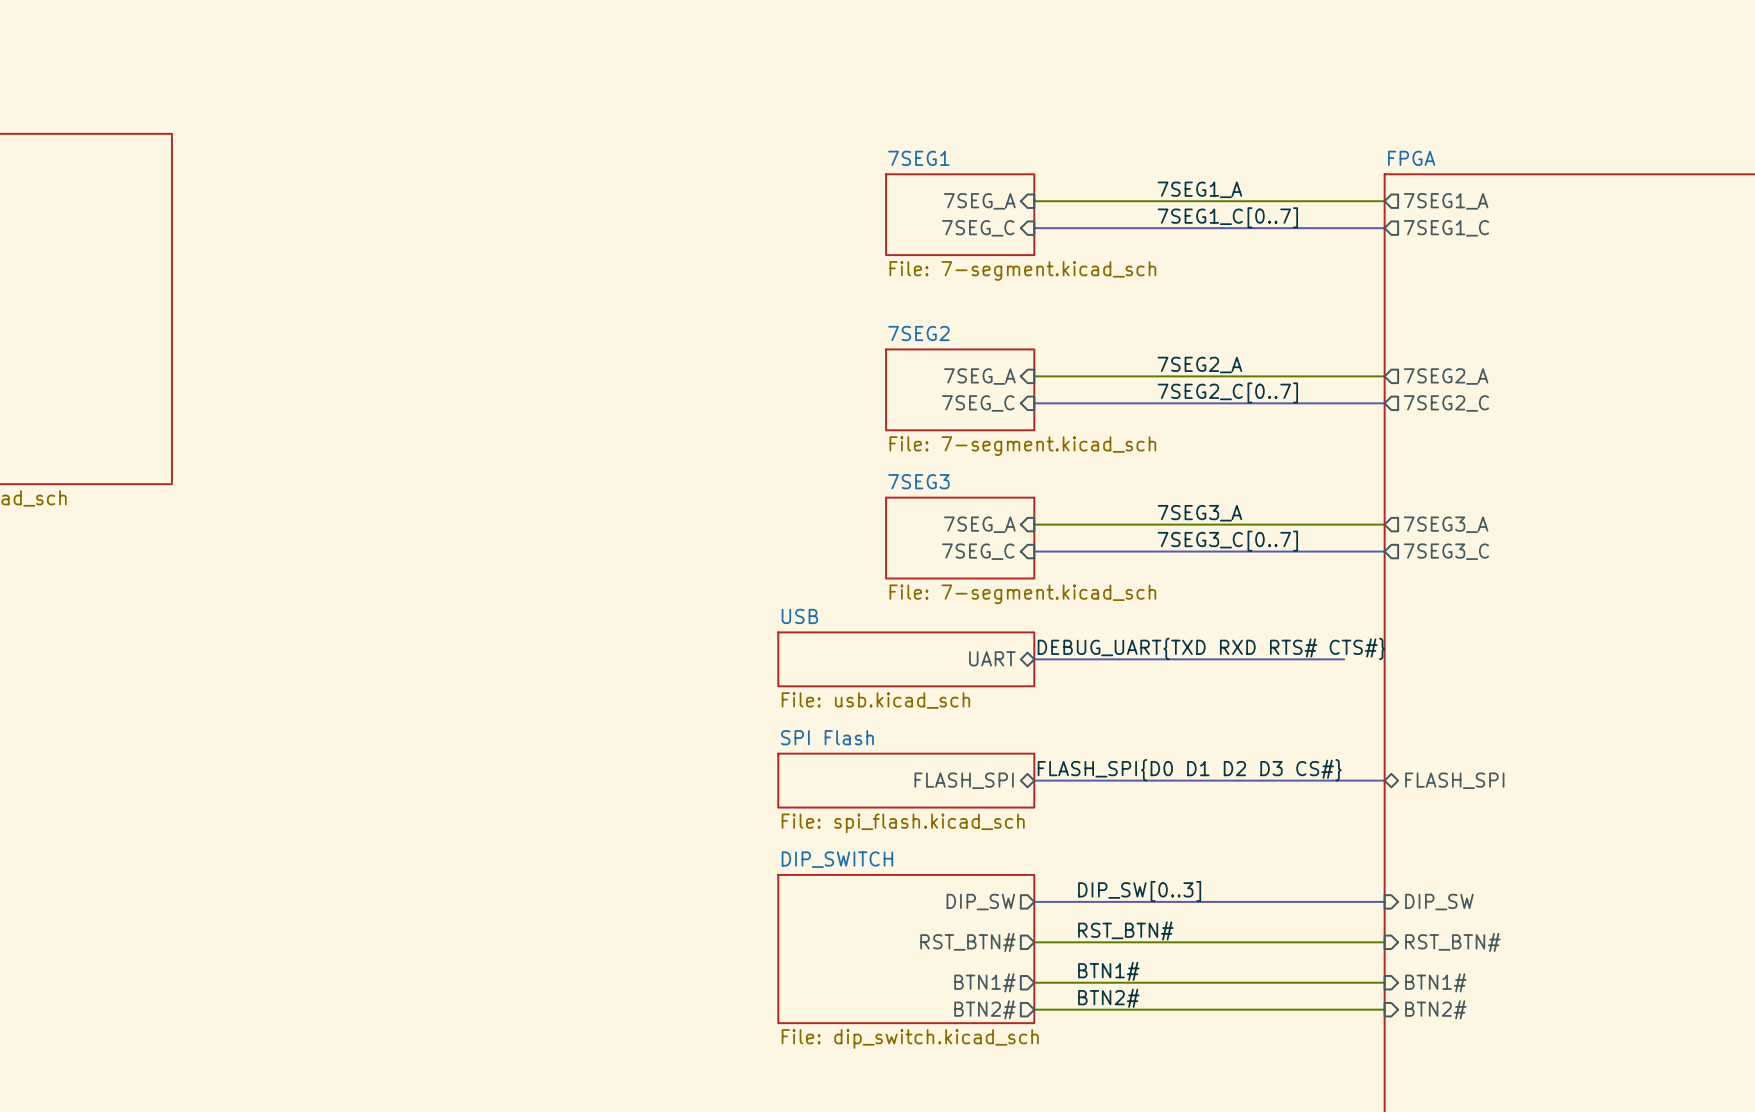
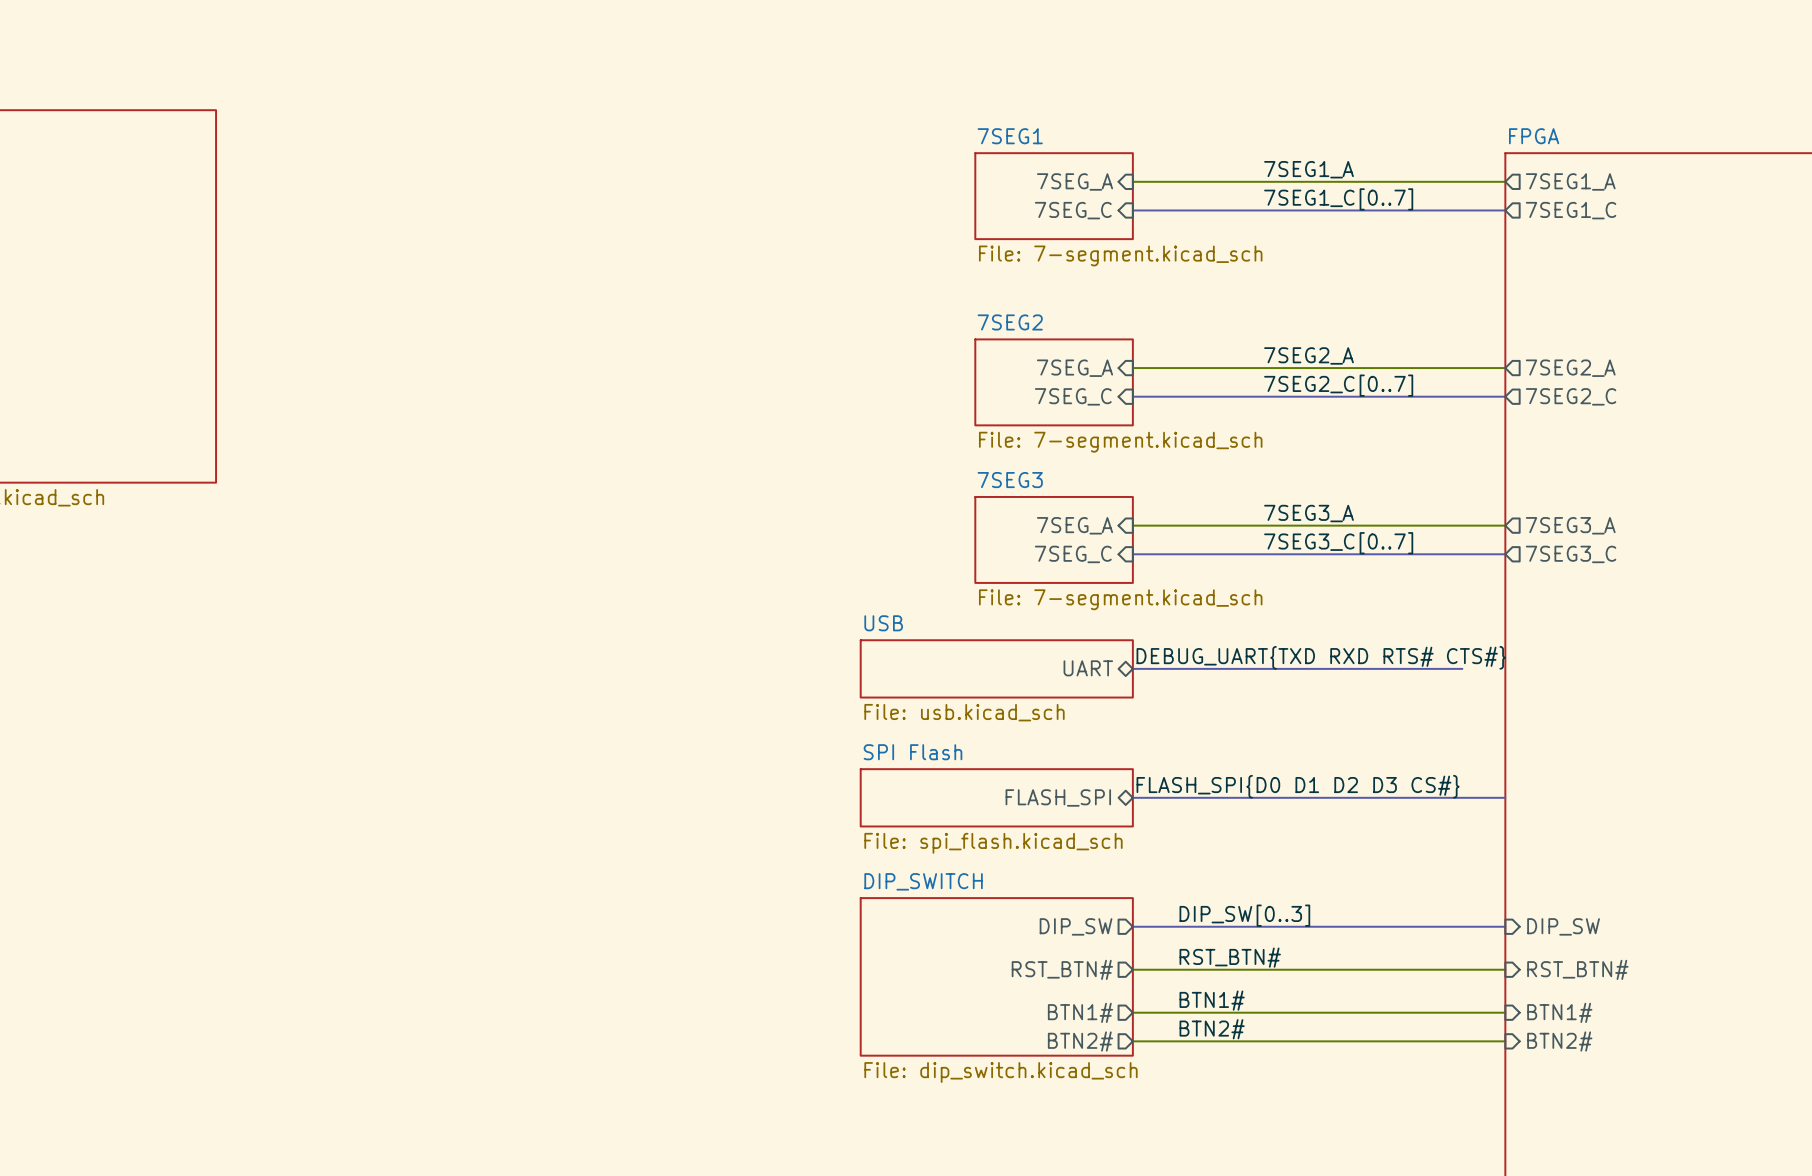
sheet pin: FLASH_SPI (1454, 780) -> none

